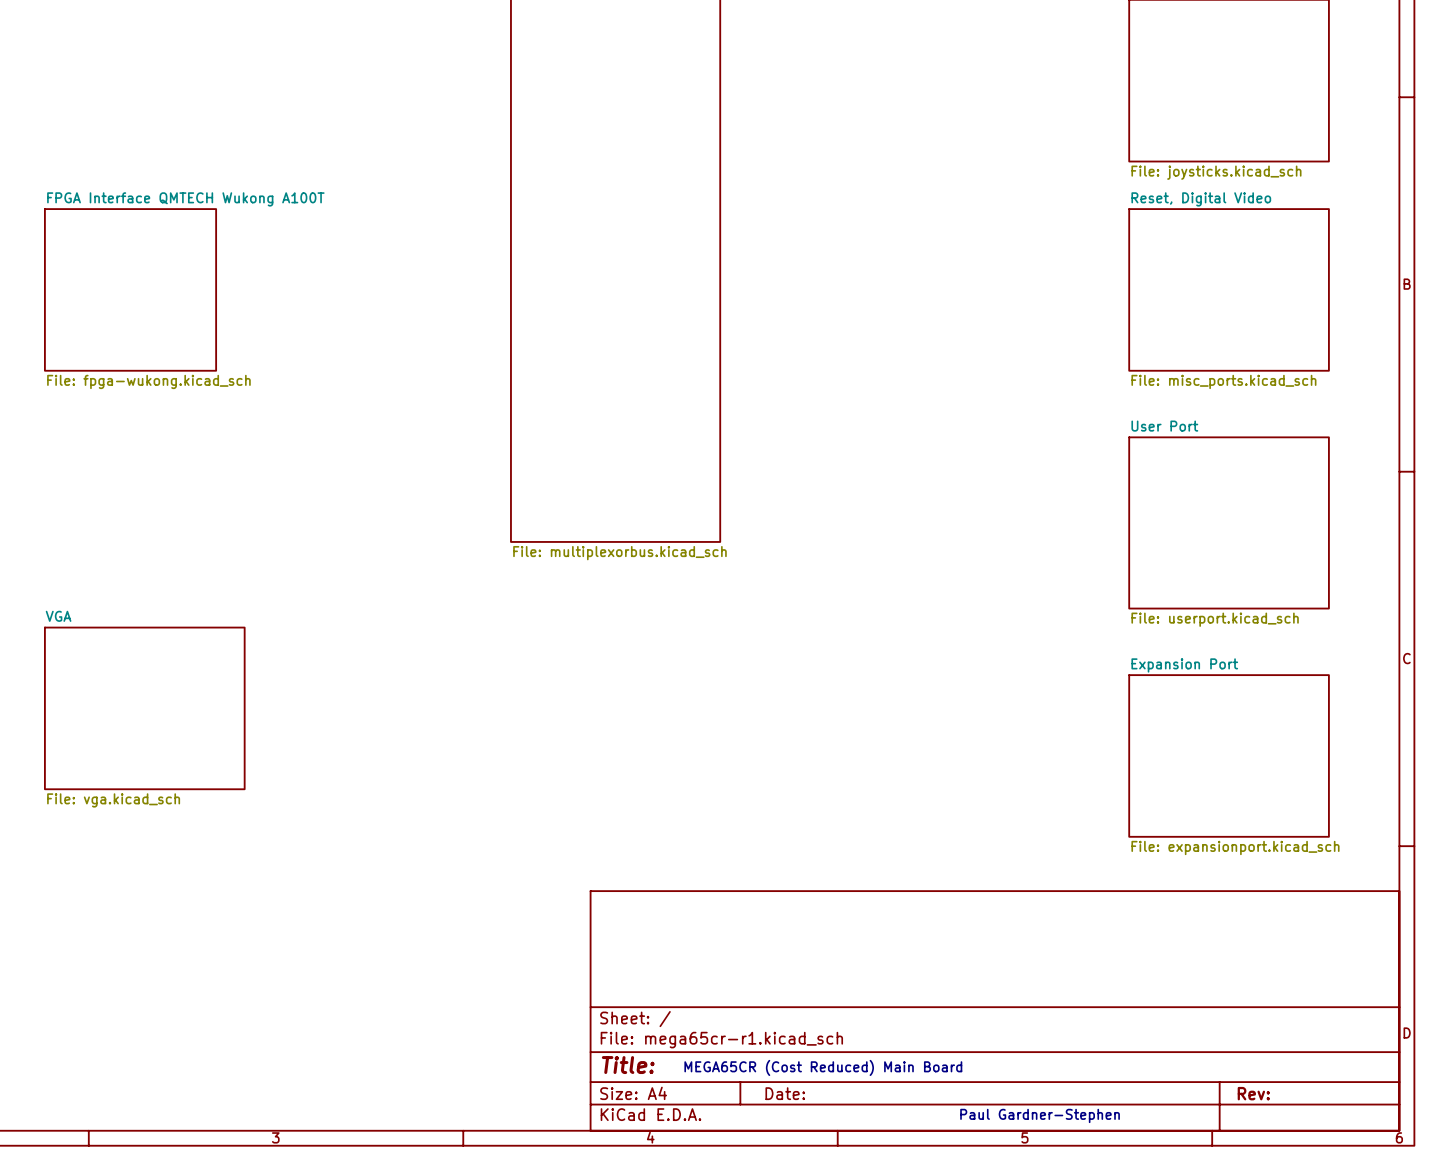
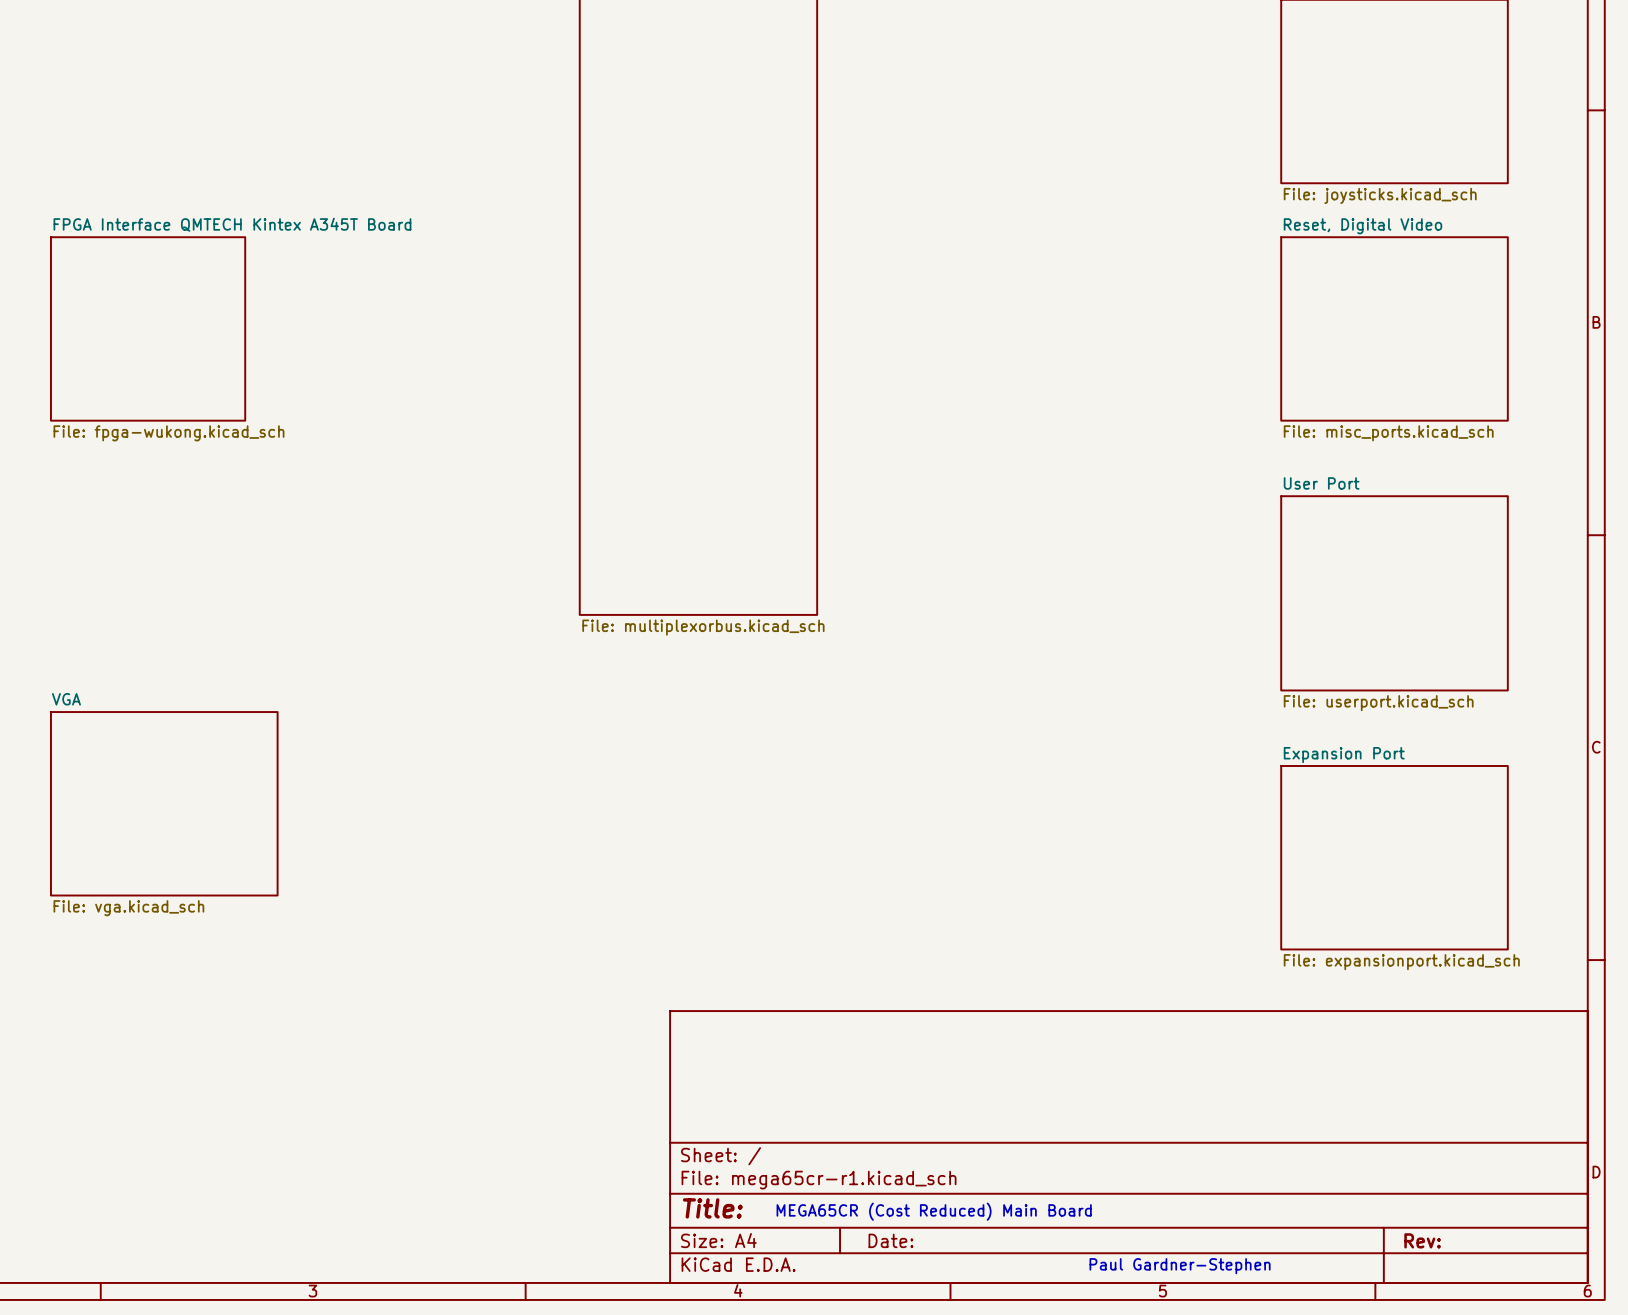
sheet FPGA Interface QMTECH Wukong A100T name: FPGA Interface QMTECH Wukong A100T (185, 199) -> FPGA Interface QMTECH Kintex A345T Board (232, 224)

